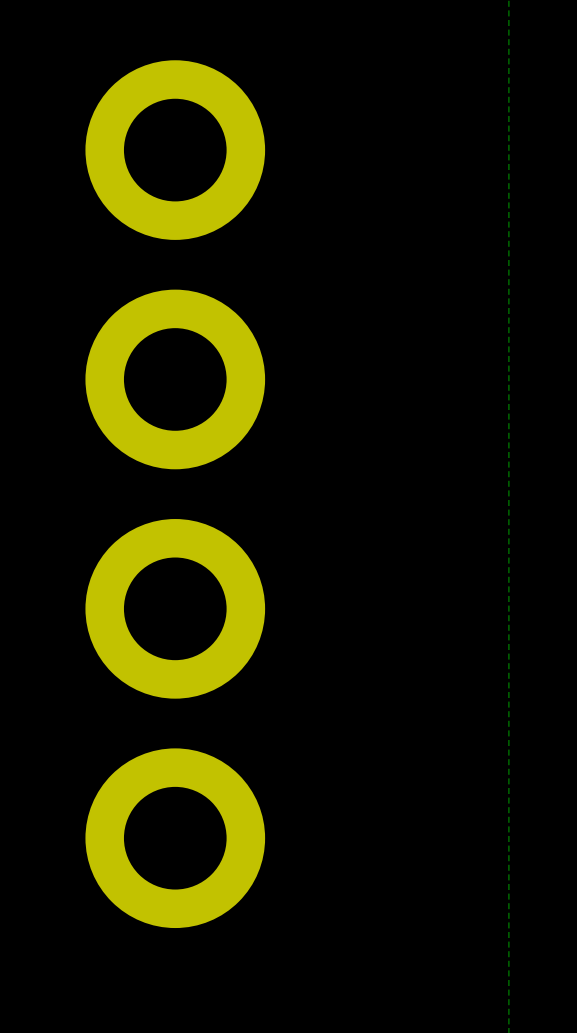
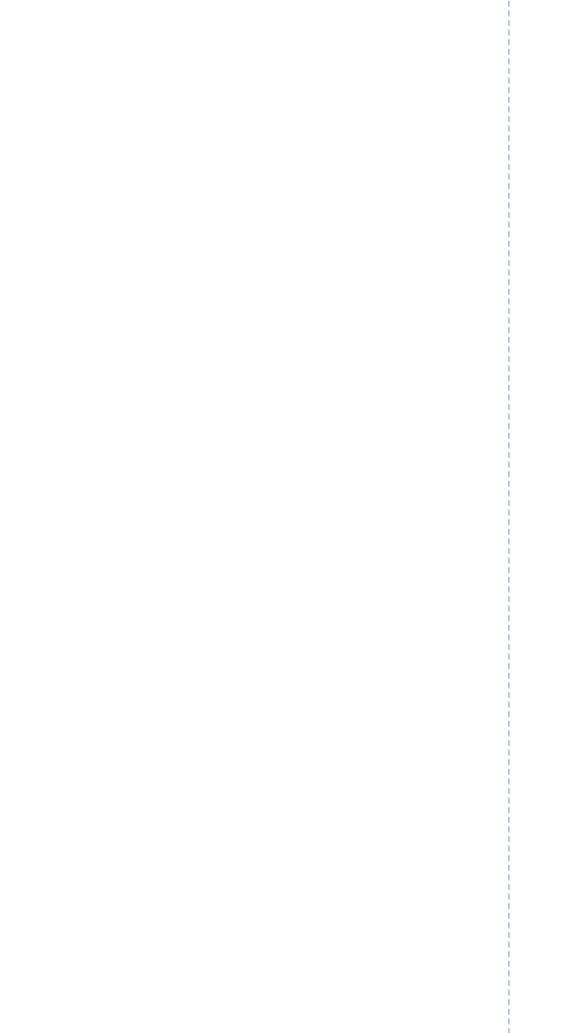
part: (175, 150) -> none
part: (175, 379) -> none
part: (175, 608) -> none
part: (175, 838) -> none

